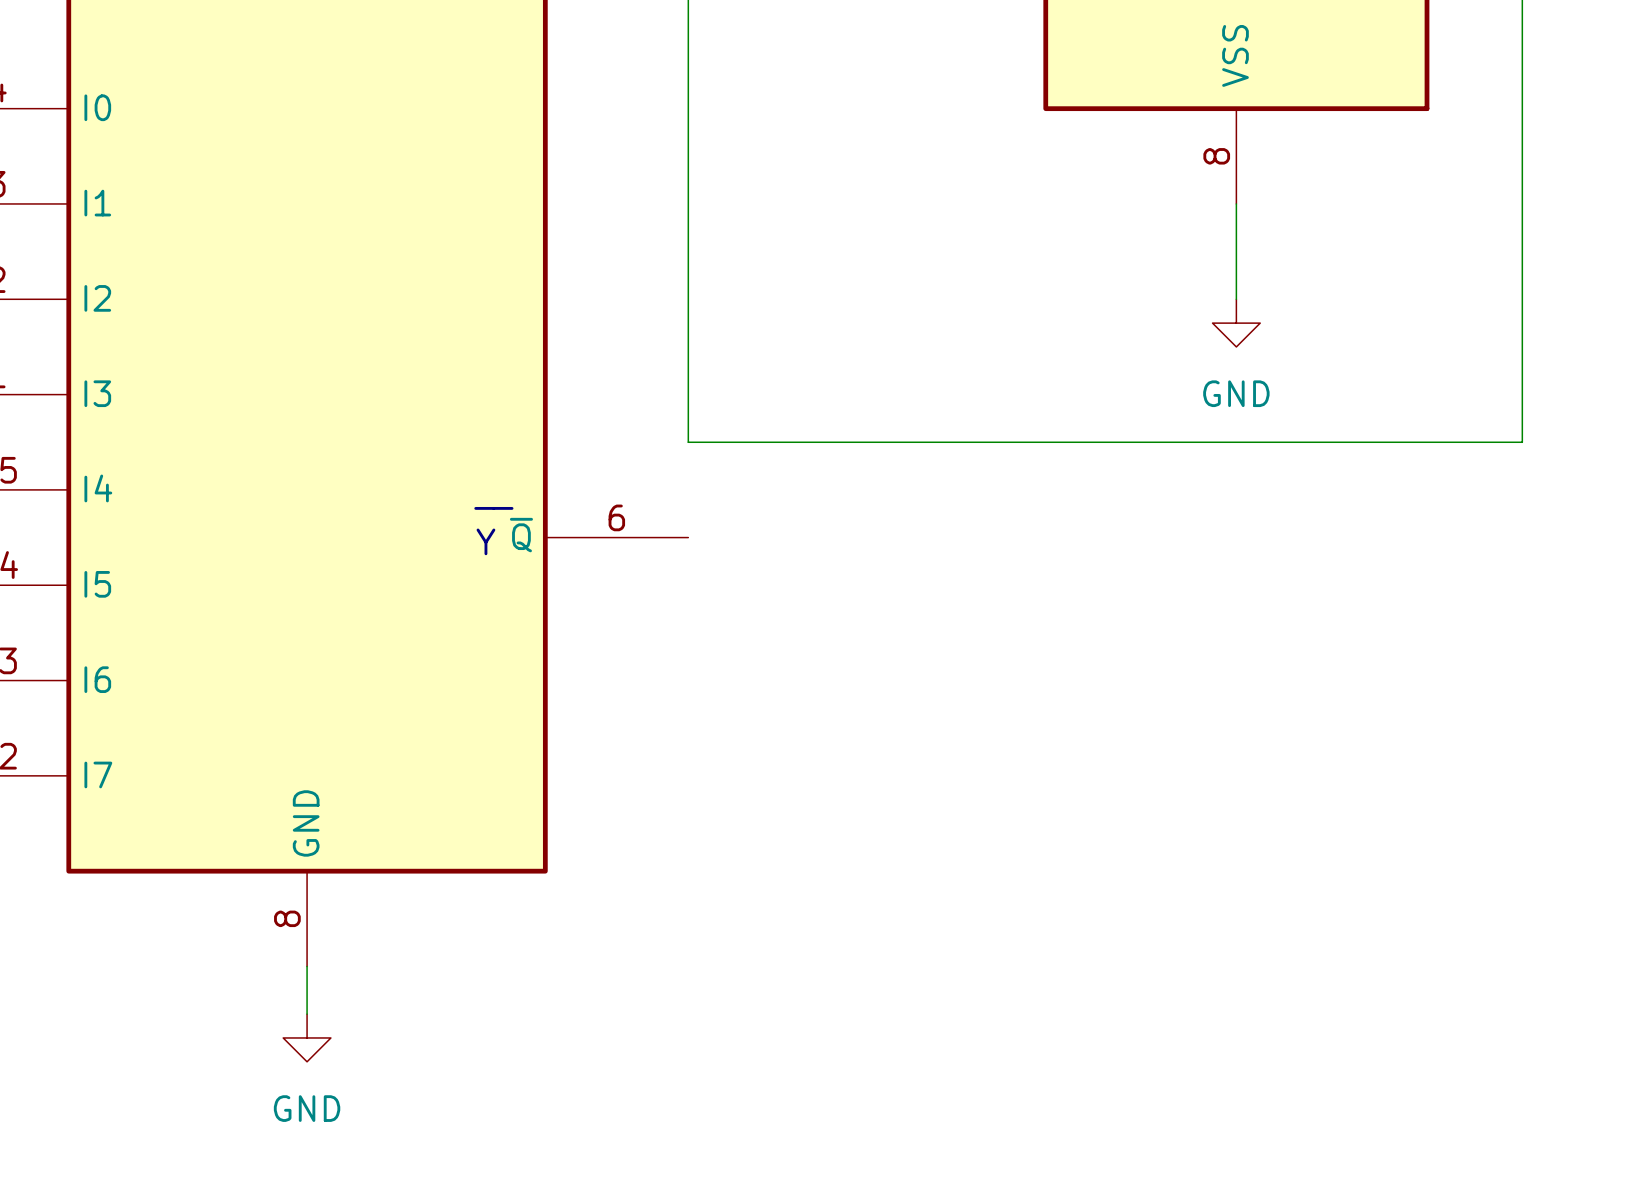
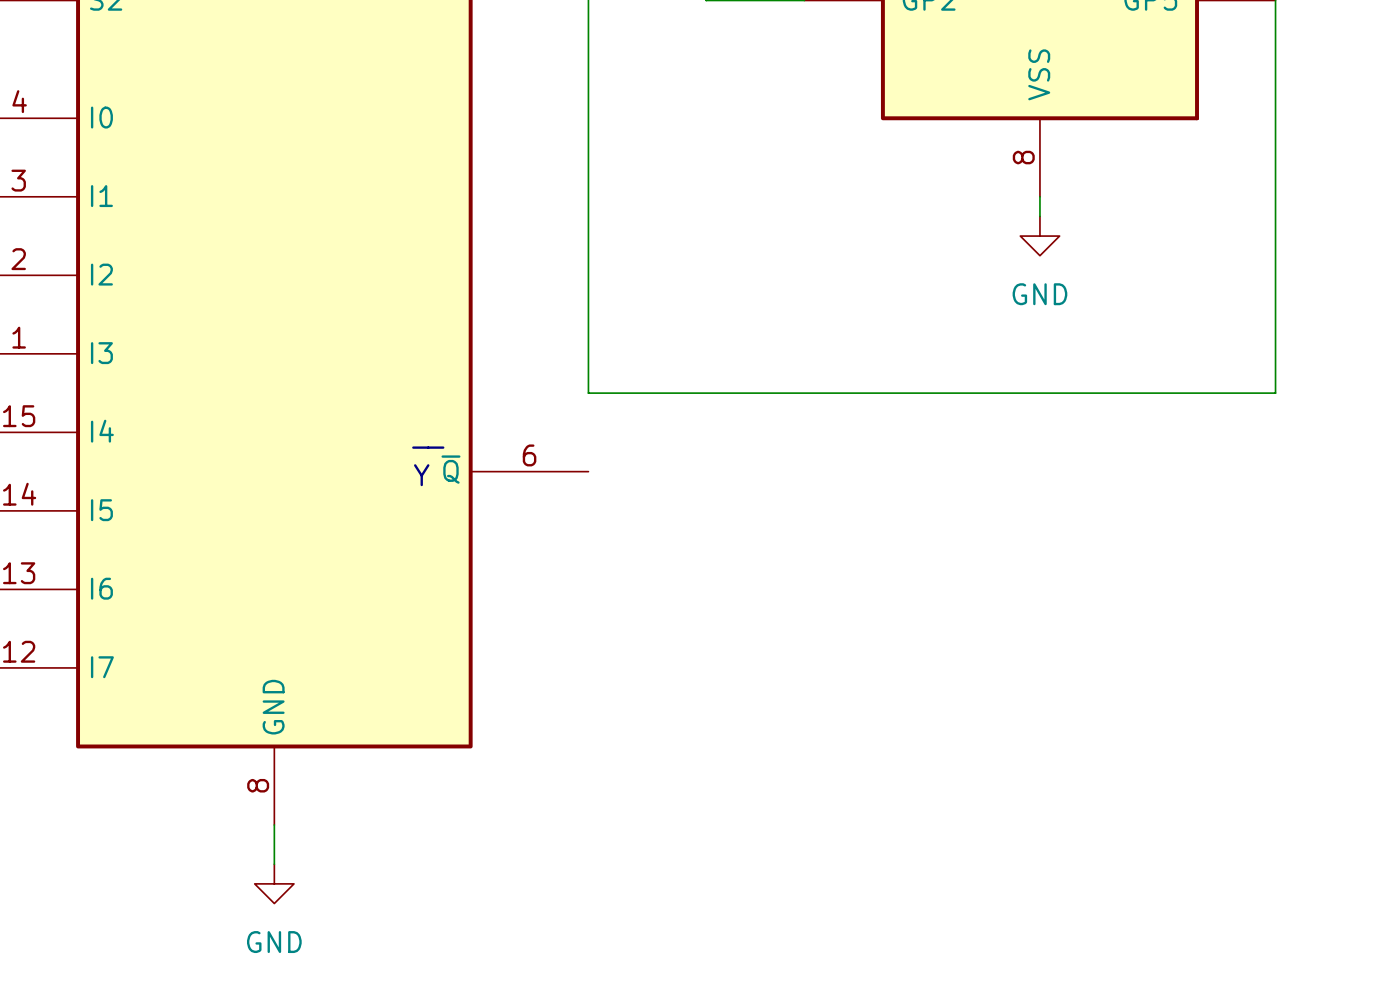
wire: (1236, 227) (1236, 299) -> none
power symbol position: GND (1236, 323) -> GND (1039, 236)

